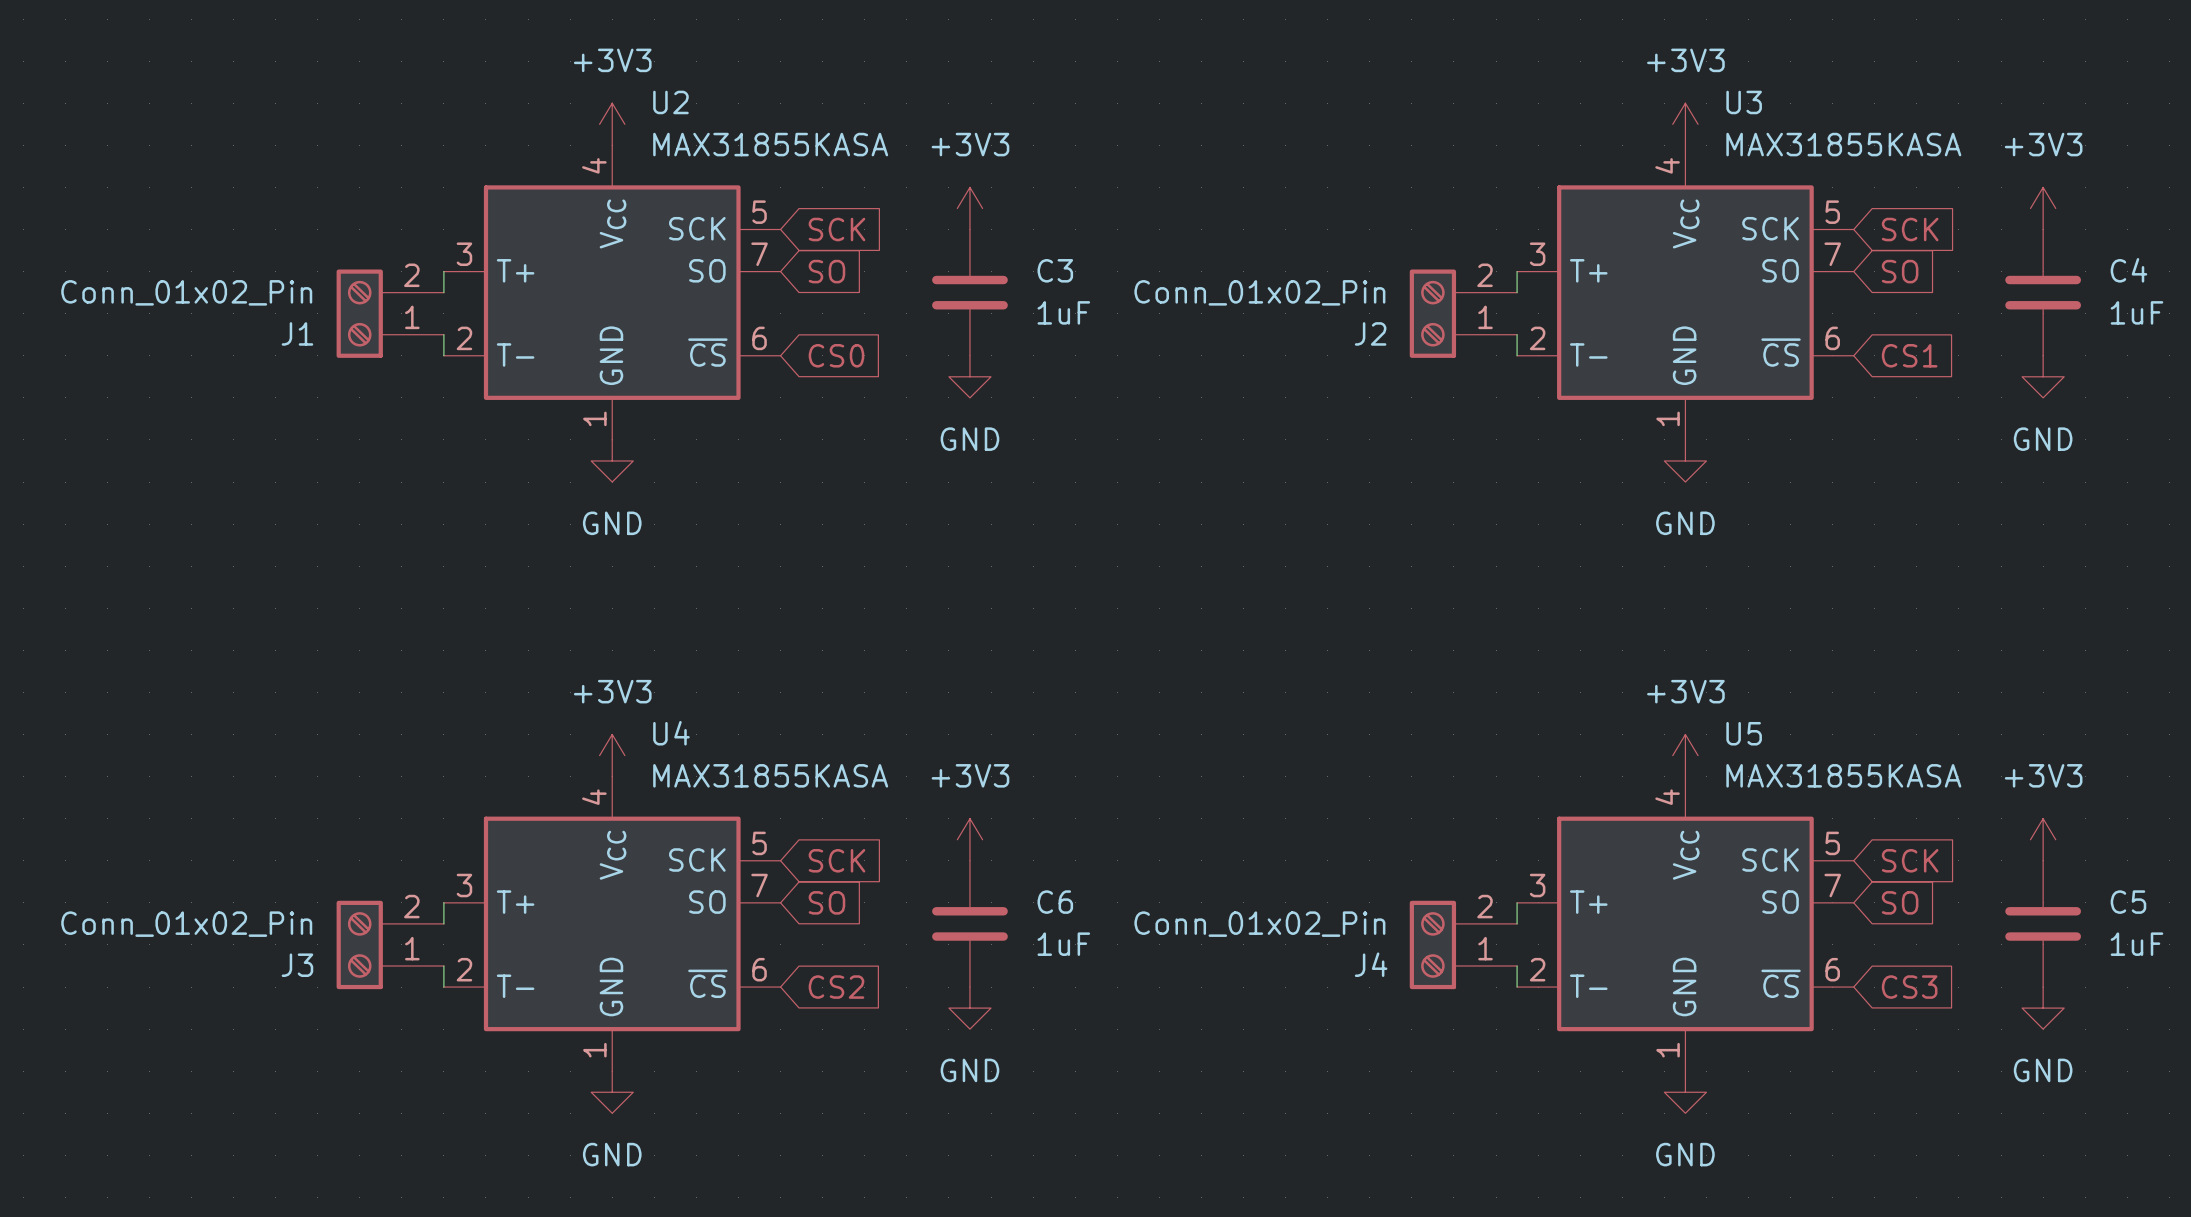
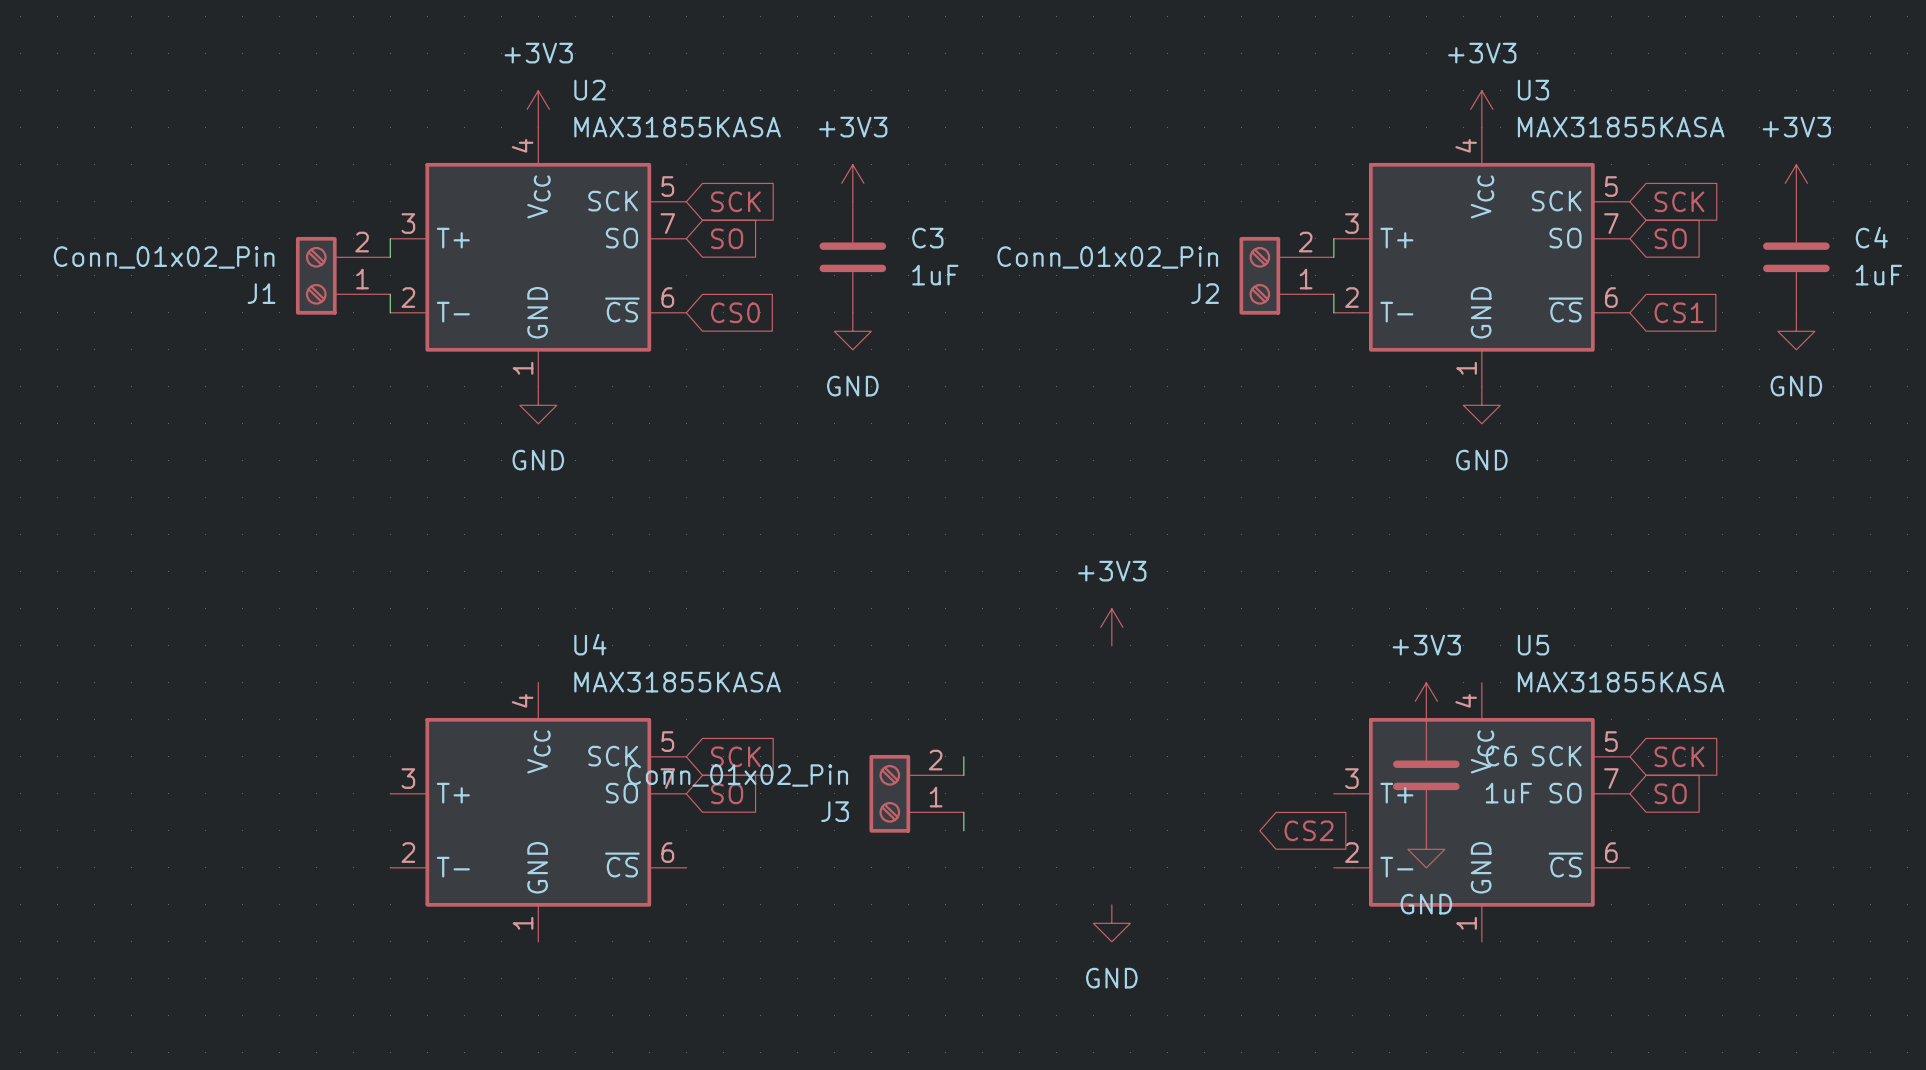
power symbol: none -> +3V3 (1111, 627)
power symbol: +3V3 (612, 755) -> none
power symbol position: +3V3 (1685, 755) -> +3V3 (1426, 701)
power symbol: +3V3 (969, 839) -> none
power symbol: +3V3 (2043, 839) -> none
wire: none -> (963, 756) (963, 775)
wire: (443, 902) (443, 923) -> none
wire: (1517, 902) (1517, 923) -> none
C6 position: (969, 923) -> (1426, 775)
wire: none -> (963, 812) (963, 830)
C5: 1uF (2043, 923) -> none
J3 position: (390, 944) -> (916, 793)
J4: Conn_01x02_Pin (1463, 944) -> none
global label: none -> CS2 (1308, 830)
wire: (443, 966) (443, 987) -> none
wire: (1517, 966) (1517, 987) -> none
global label: CS2 (836, 987) -> none
global label: CS3 (1909, 987) -> none
power symbol: GND (969, 1008) -> none
power symbol: GND (2043, 1008) -> none
power symbol: none -> GND (1111, 923)
power symbol: GND (612, 1092) -> none
power symbol position: GND (1685, 1092) -> GND (1426, 849)

